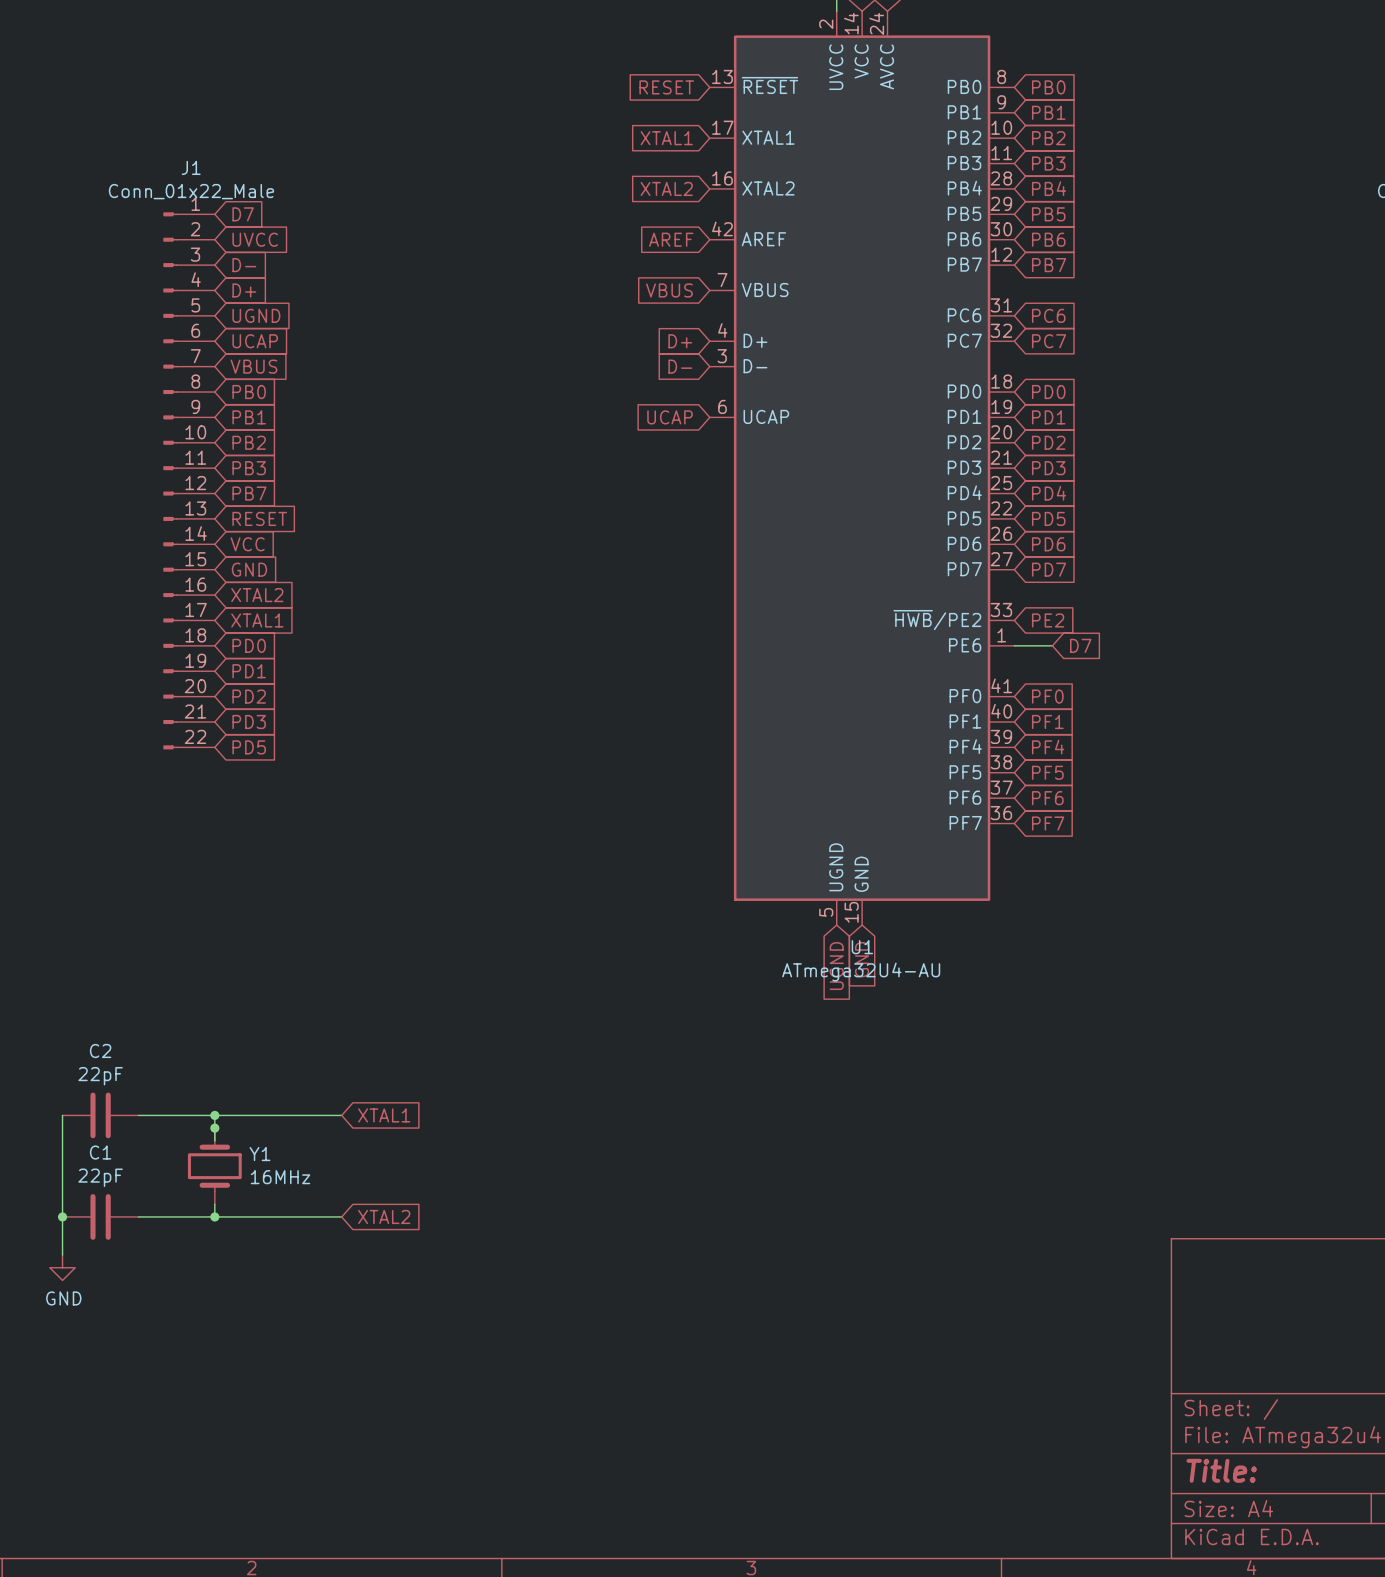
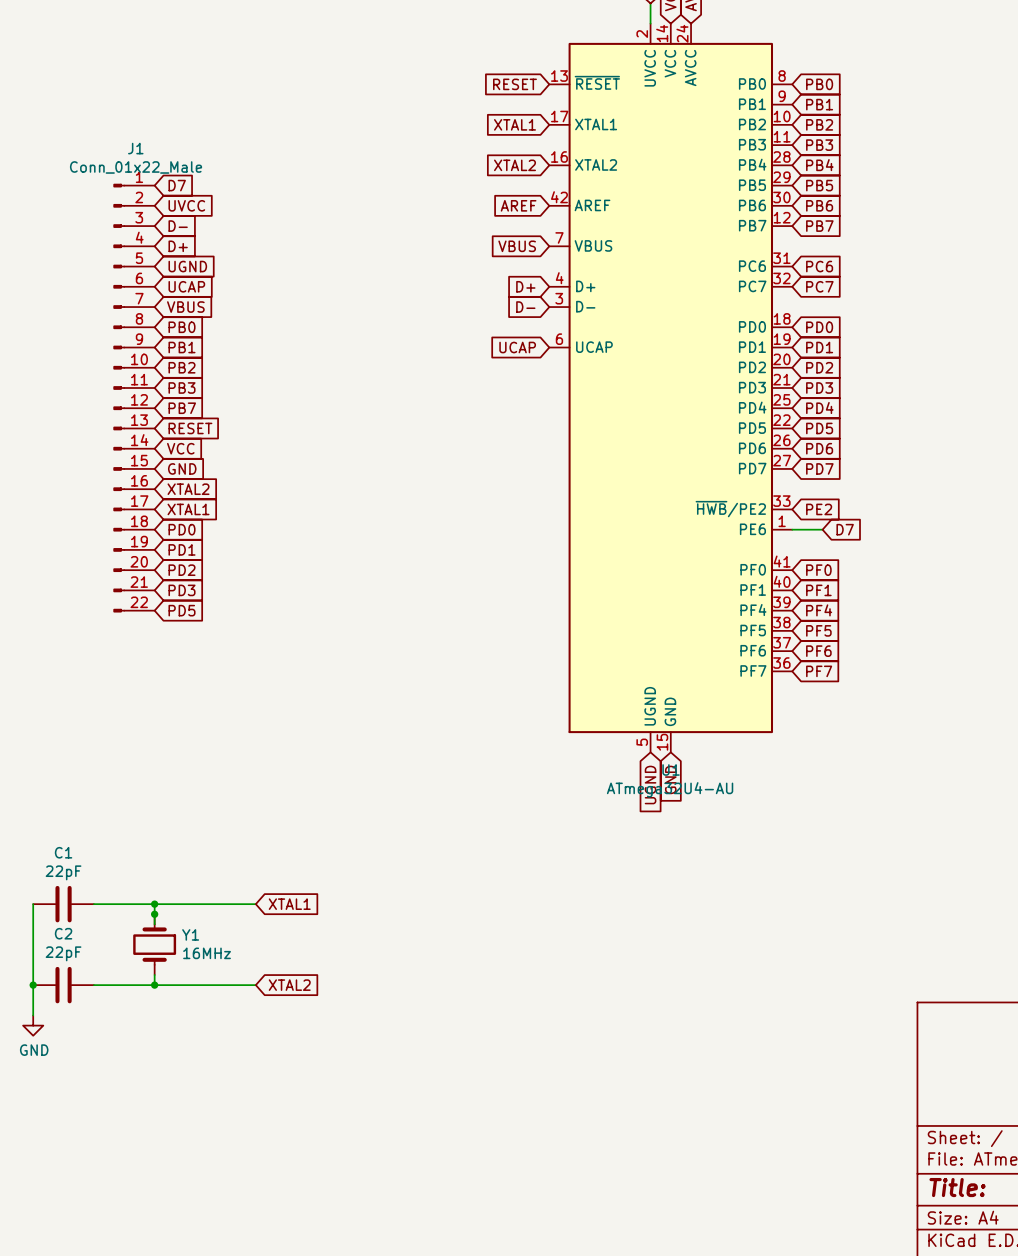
C2 name: C2 (100, 1050) -> C1 (63, 852)
C1 name: C1 (100, 1152) -> C2 (63, 933)

